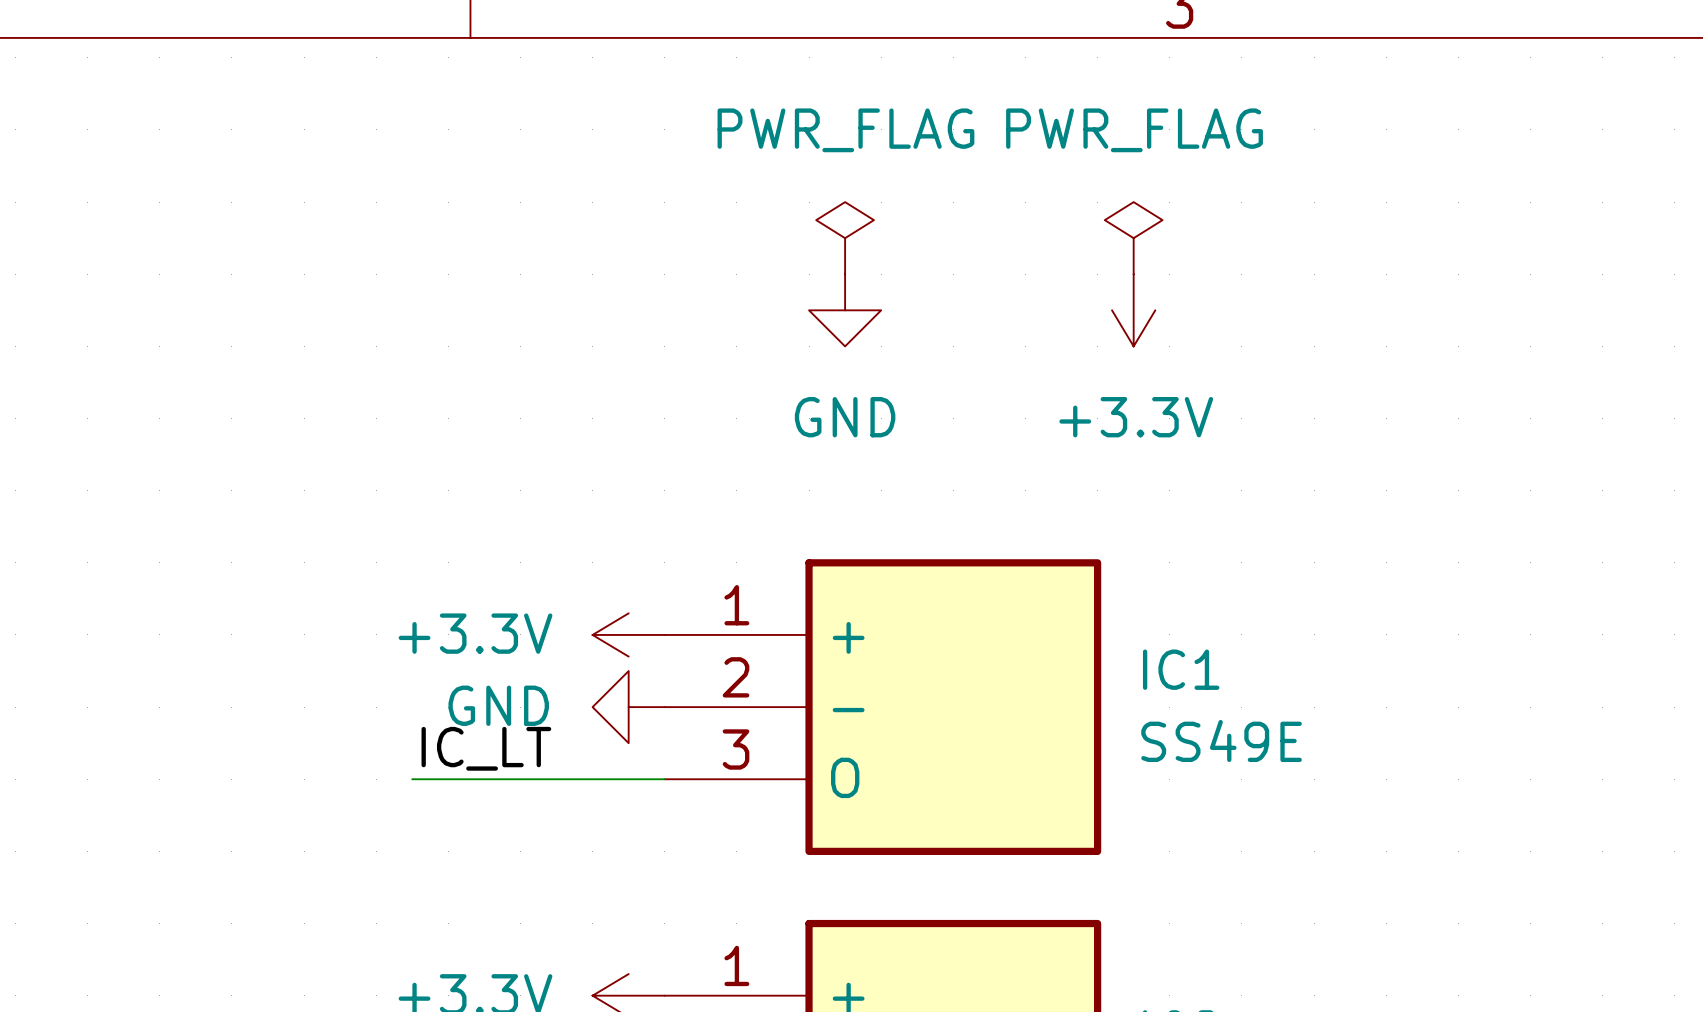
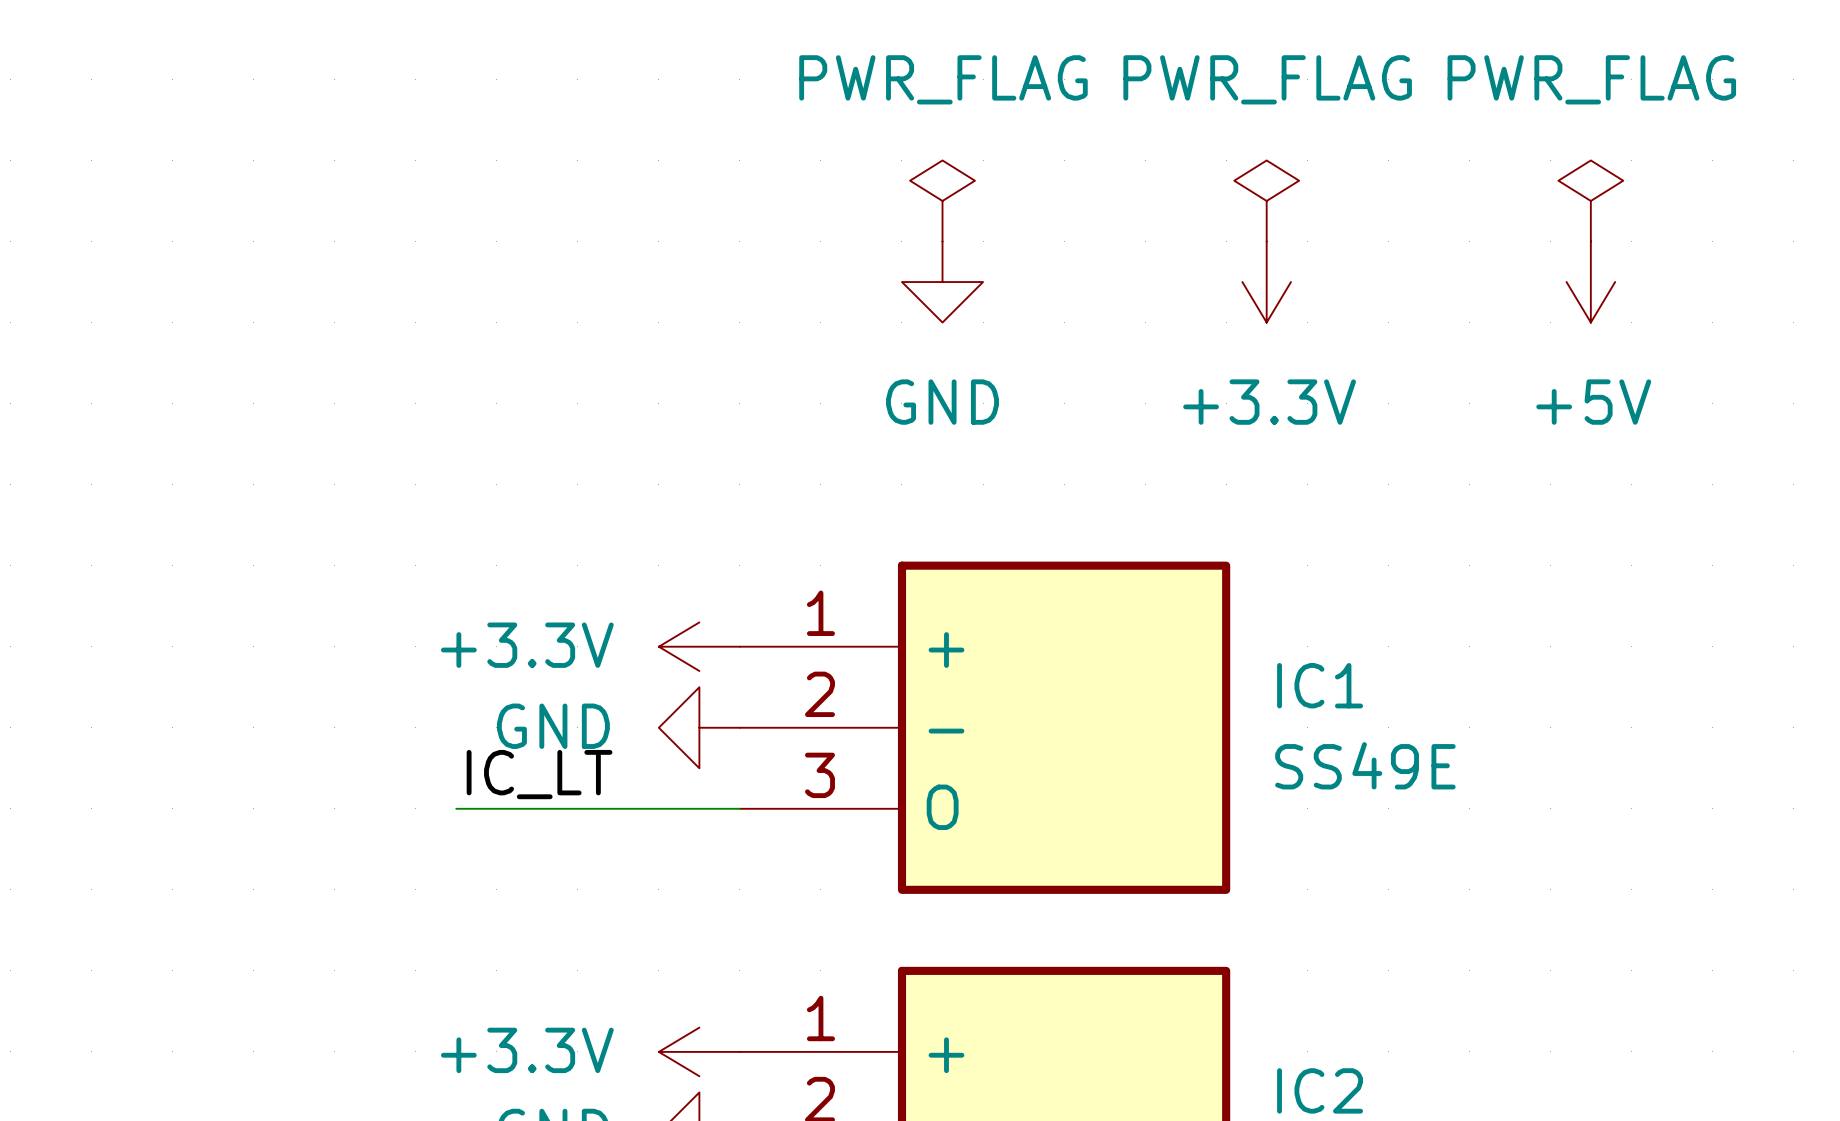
power symbol: none -> PWR_FLAG (1590, 200)
power symbol: none -> +5V (1590, 282)

